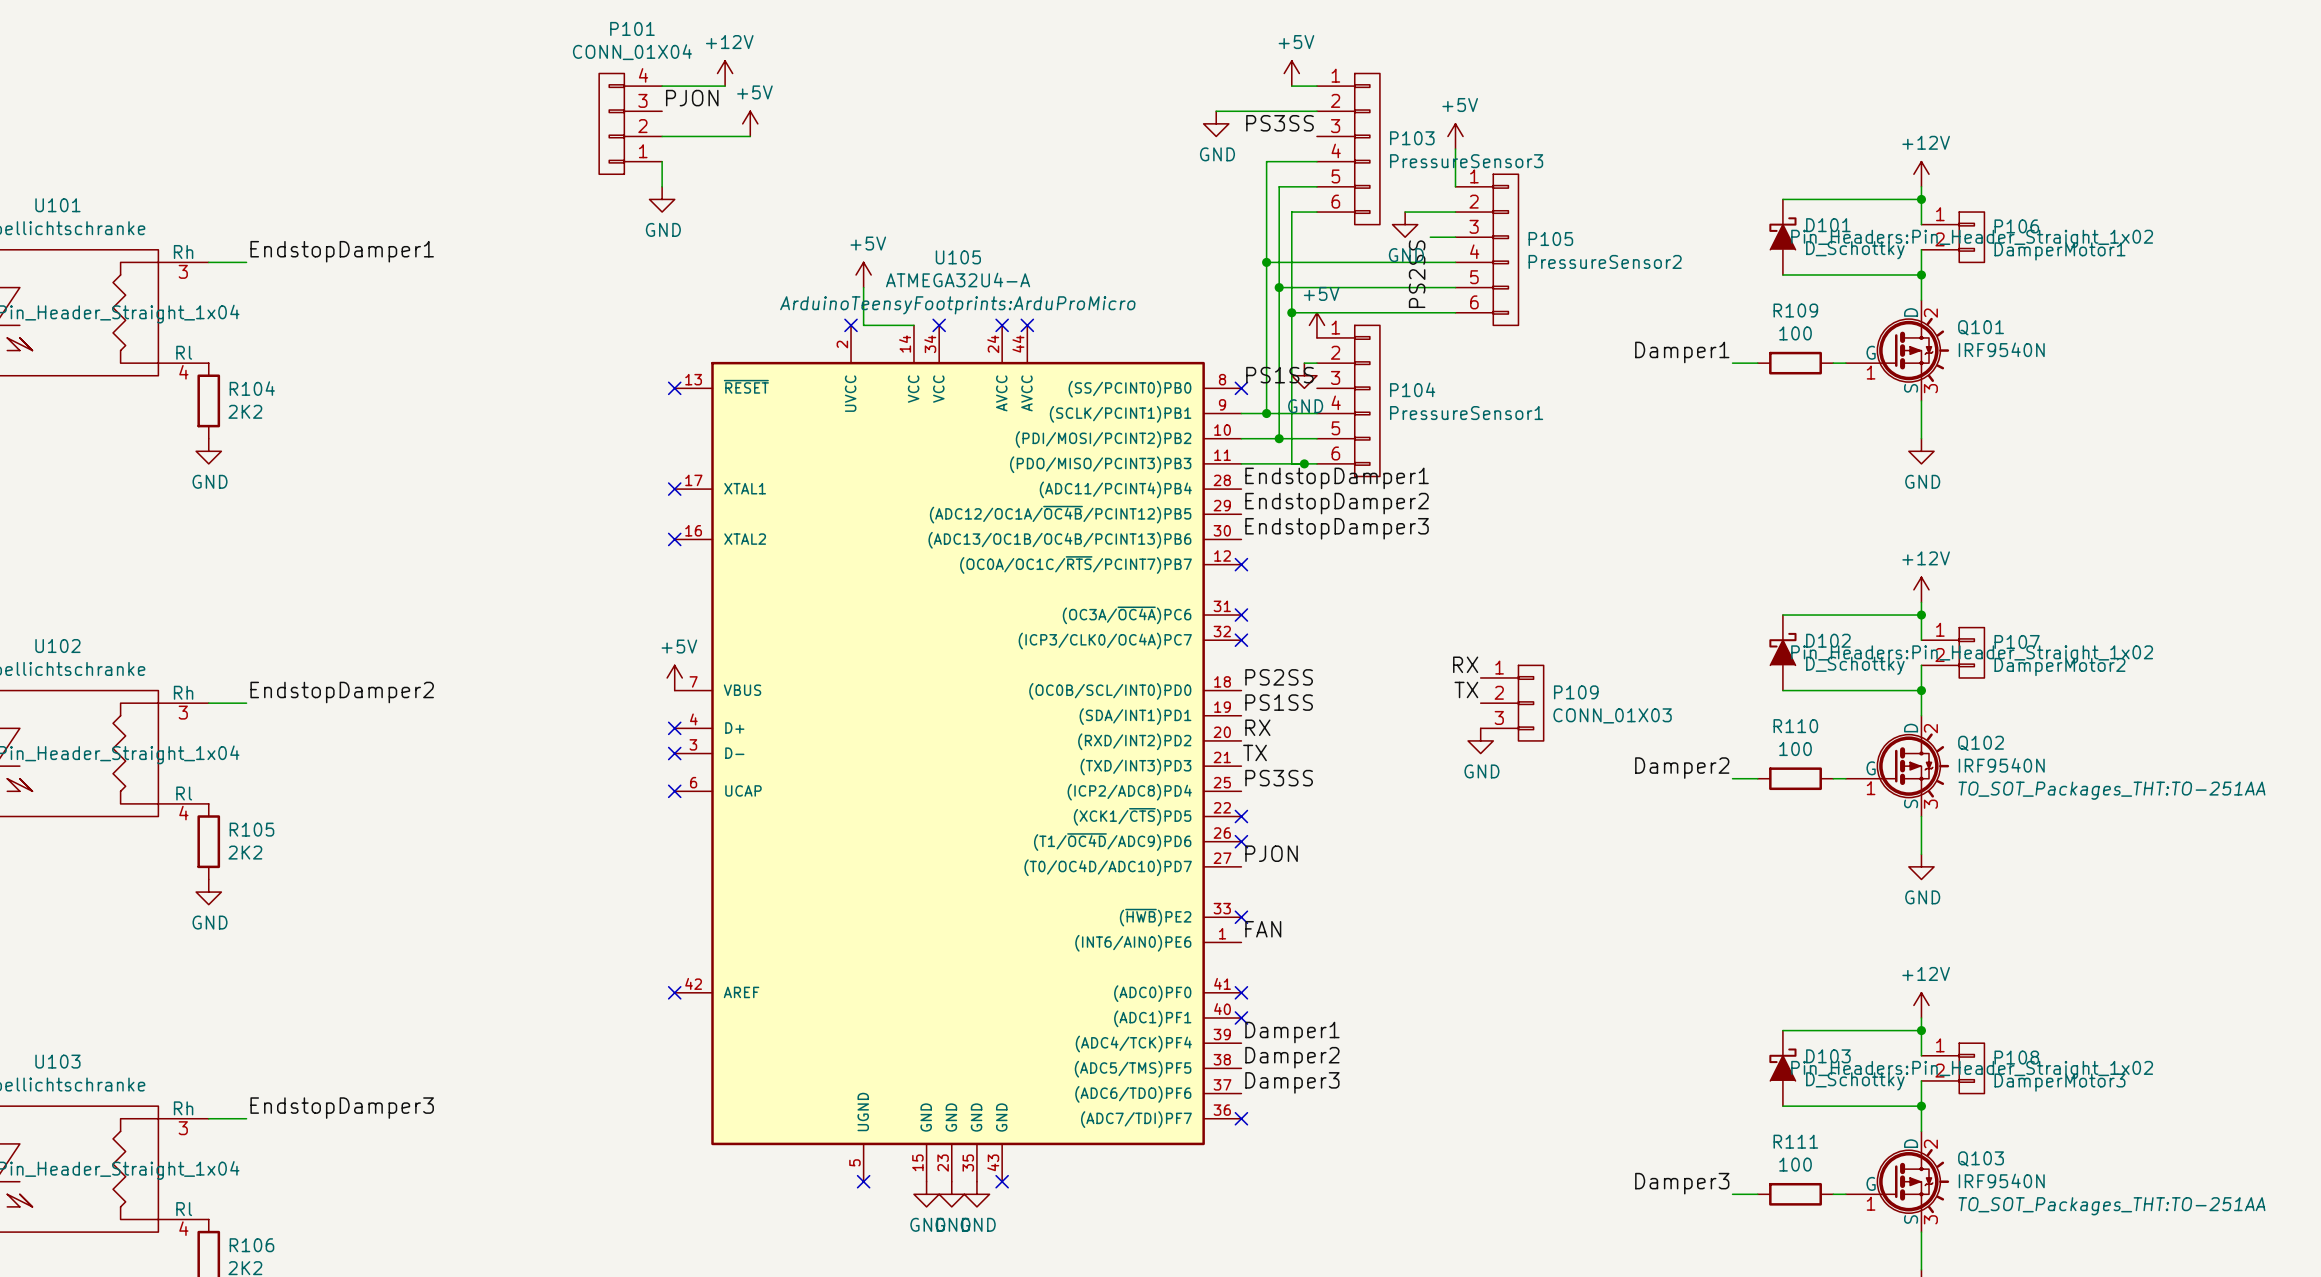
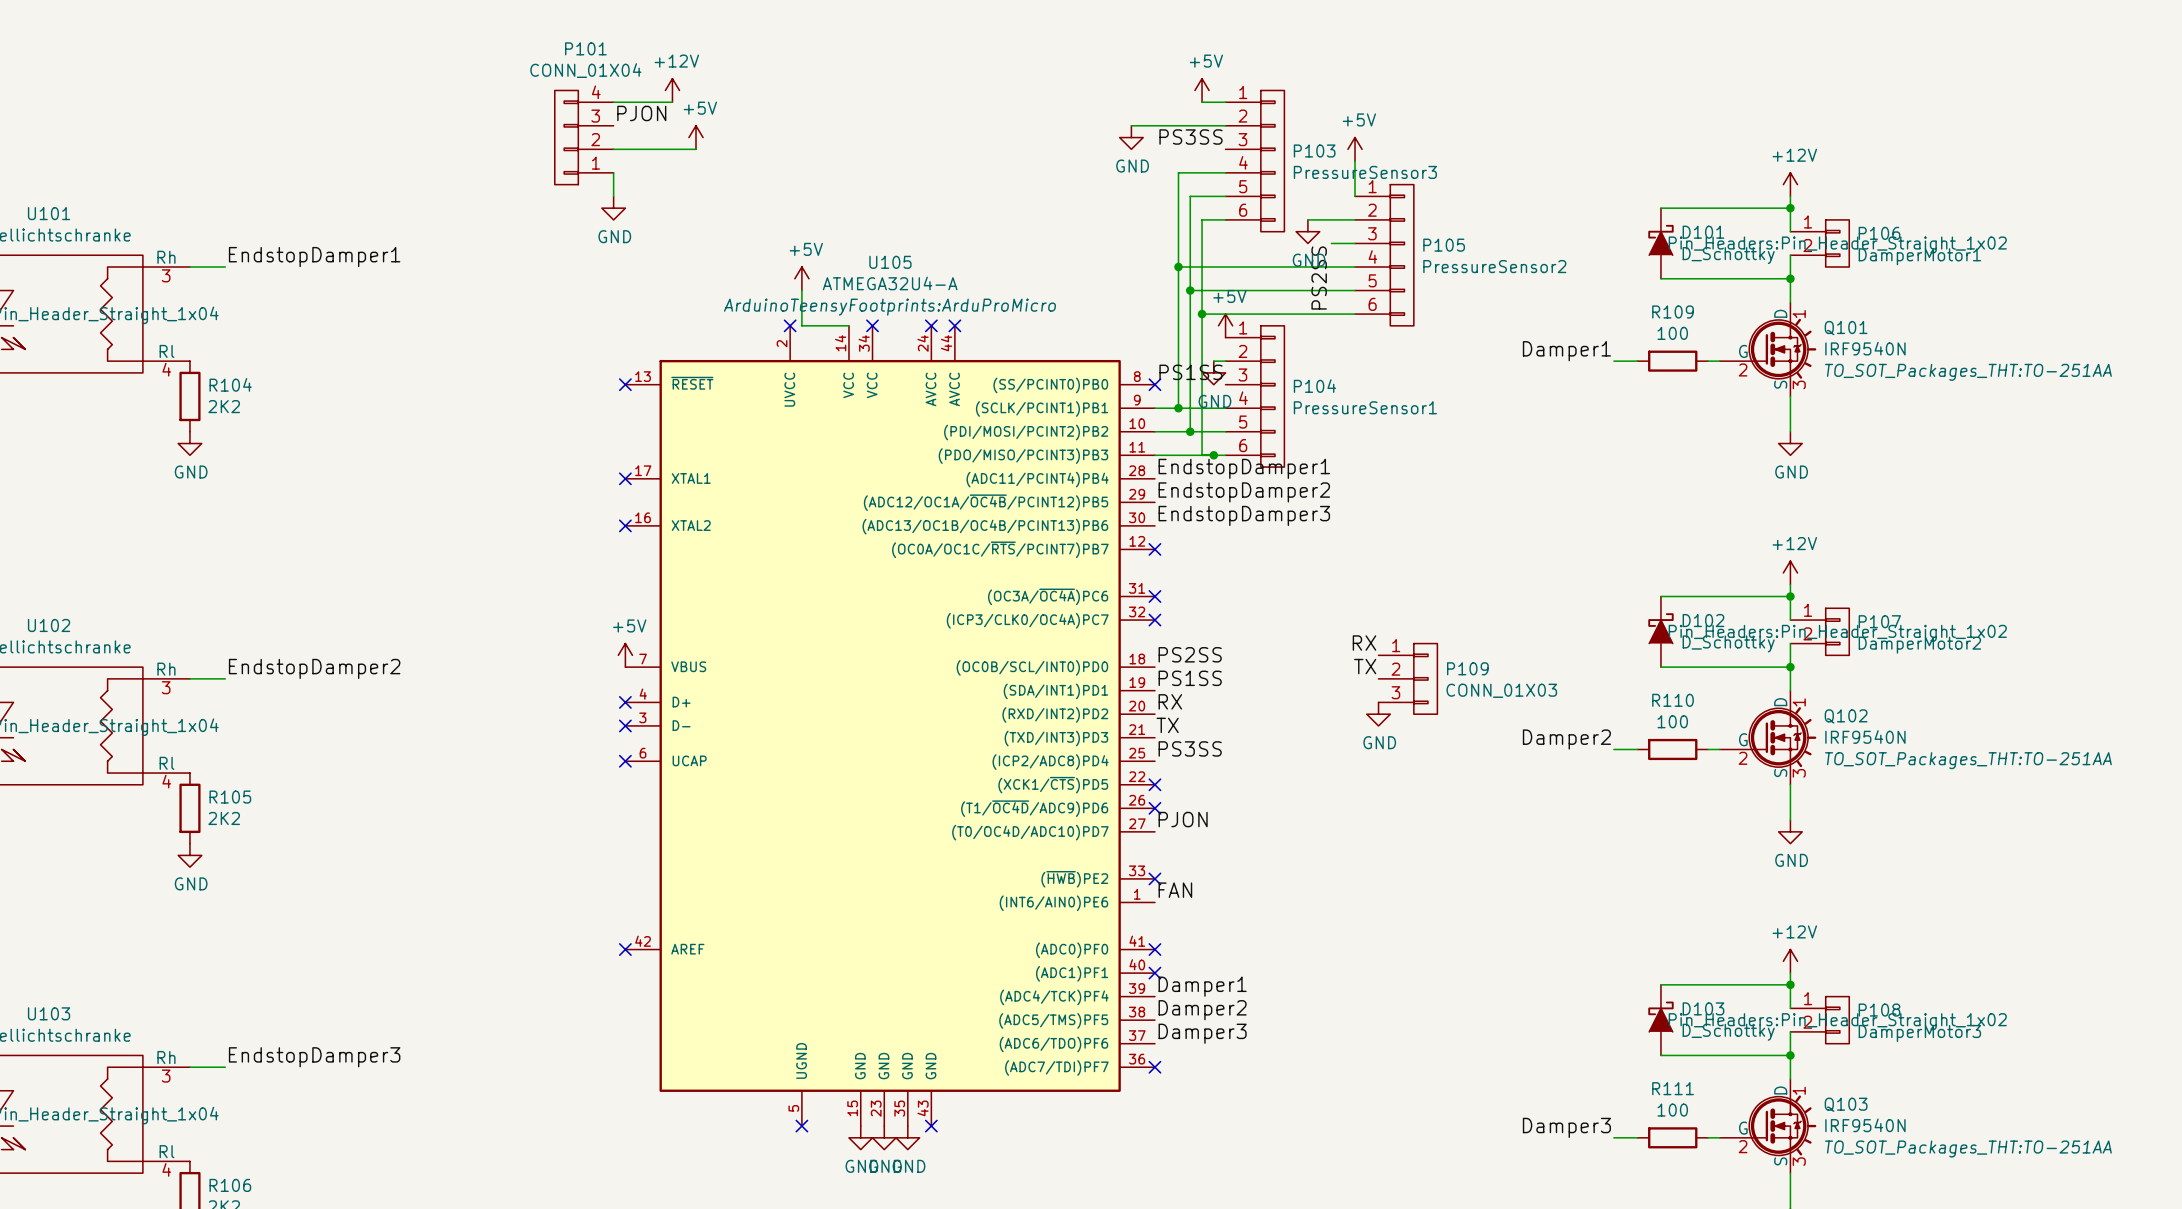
Q101 symbol: [1845, 300, 1950, 401] -> [1719, 302, 1817, 397]
Q101 text: none -> TO_SOT_Packages_THT:TO-251AA (1968, 372)
Q102 symbol: [1845, 715, 1950, 817] -> [1719, 690, 1817, 785]
Q103 symbol: [1845, 1131, 1950, 1233] -> [1719, 1078, 1817, 1174]

